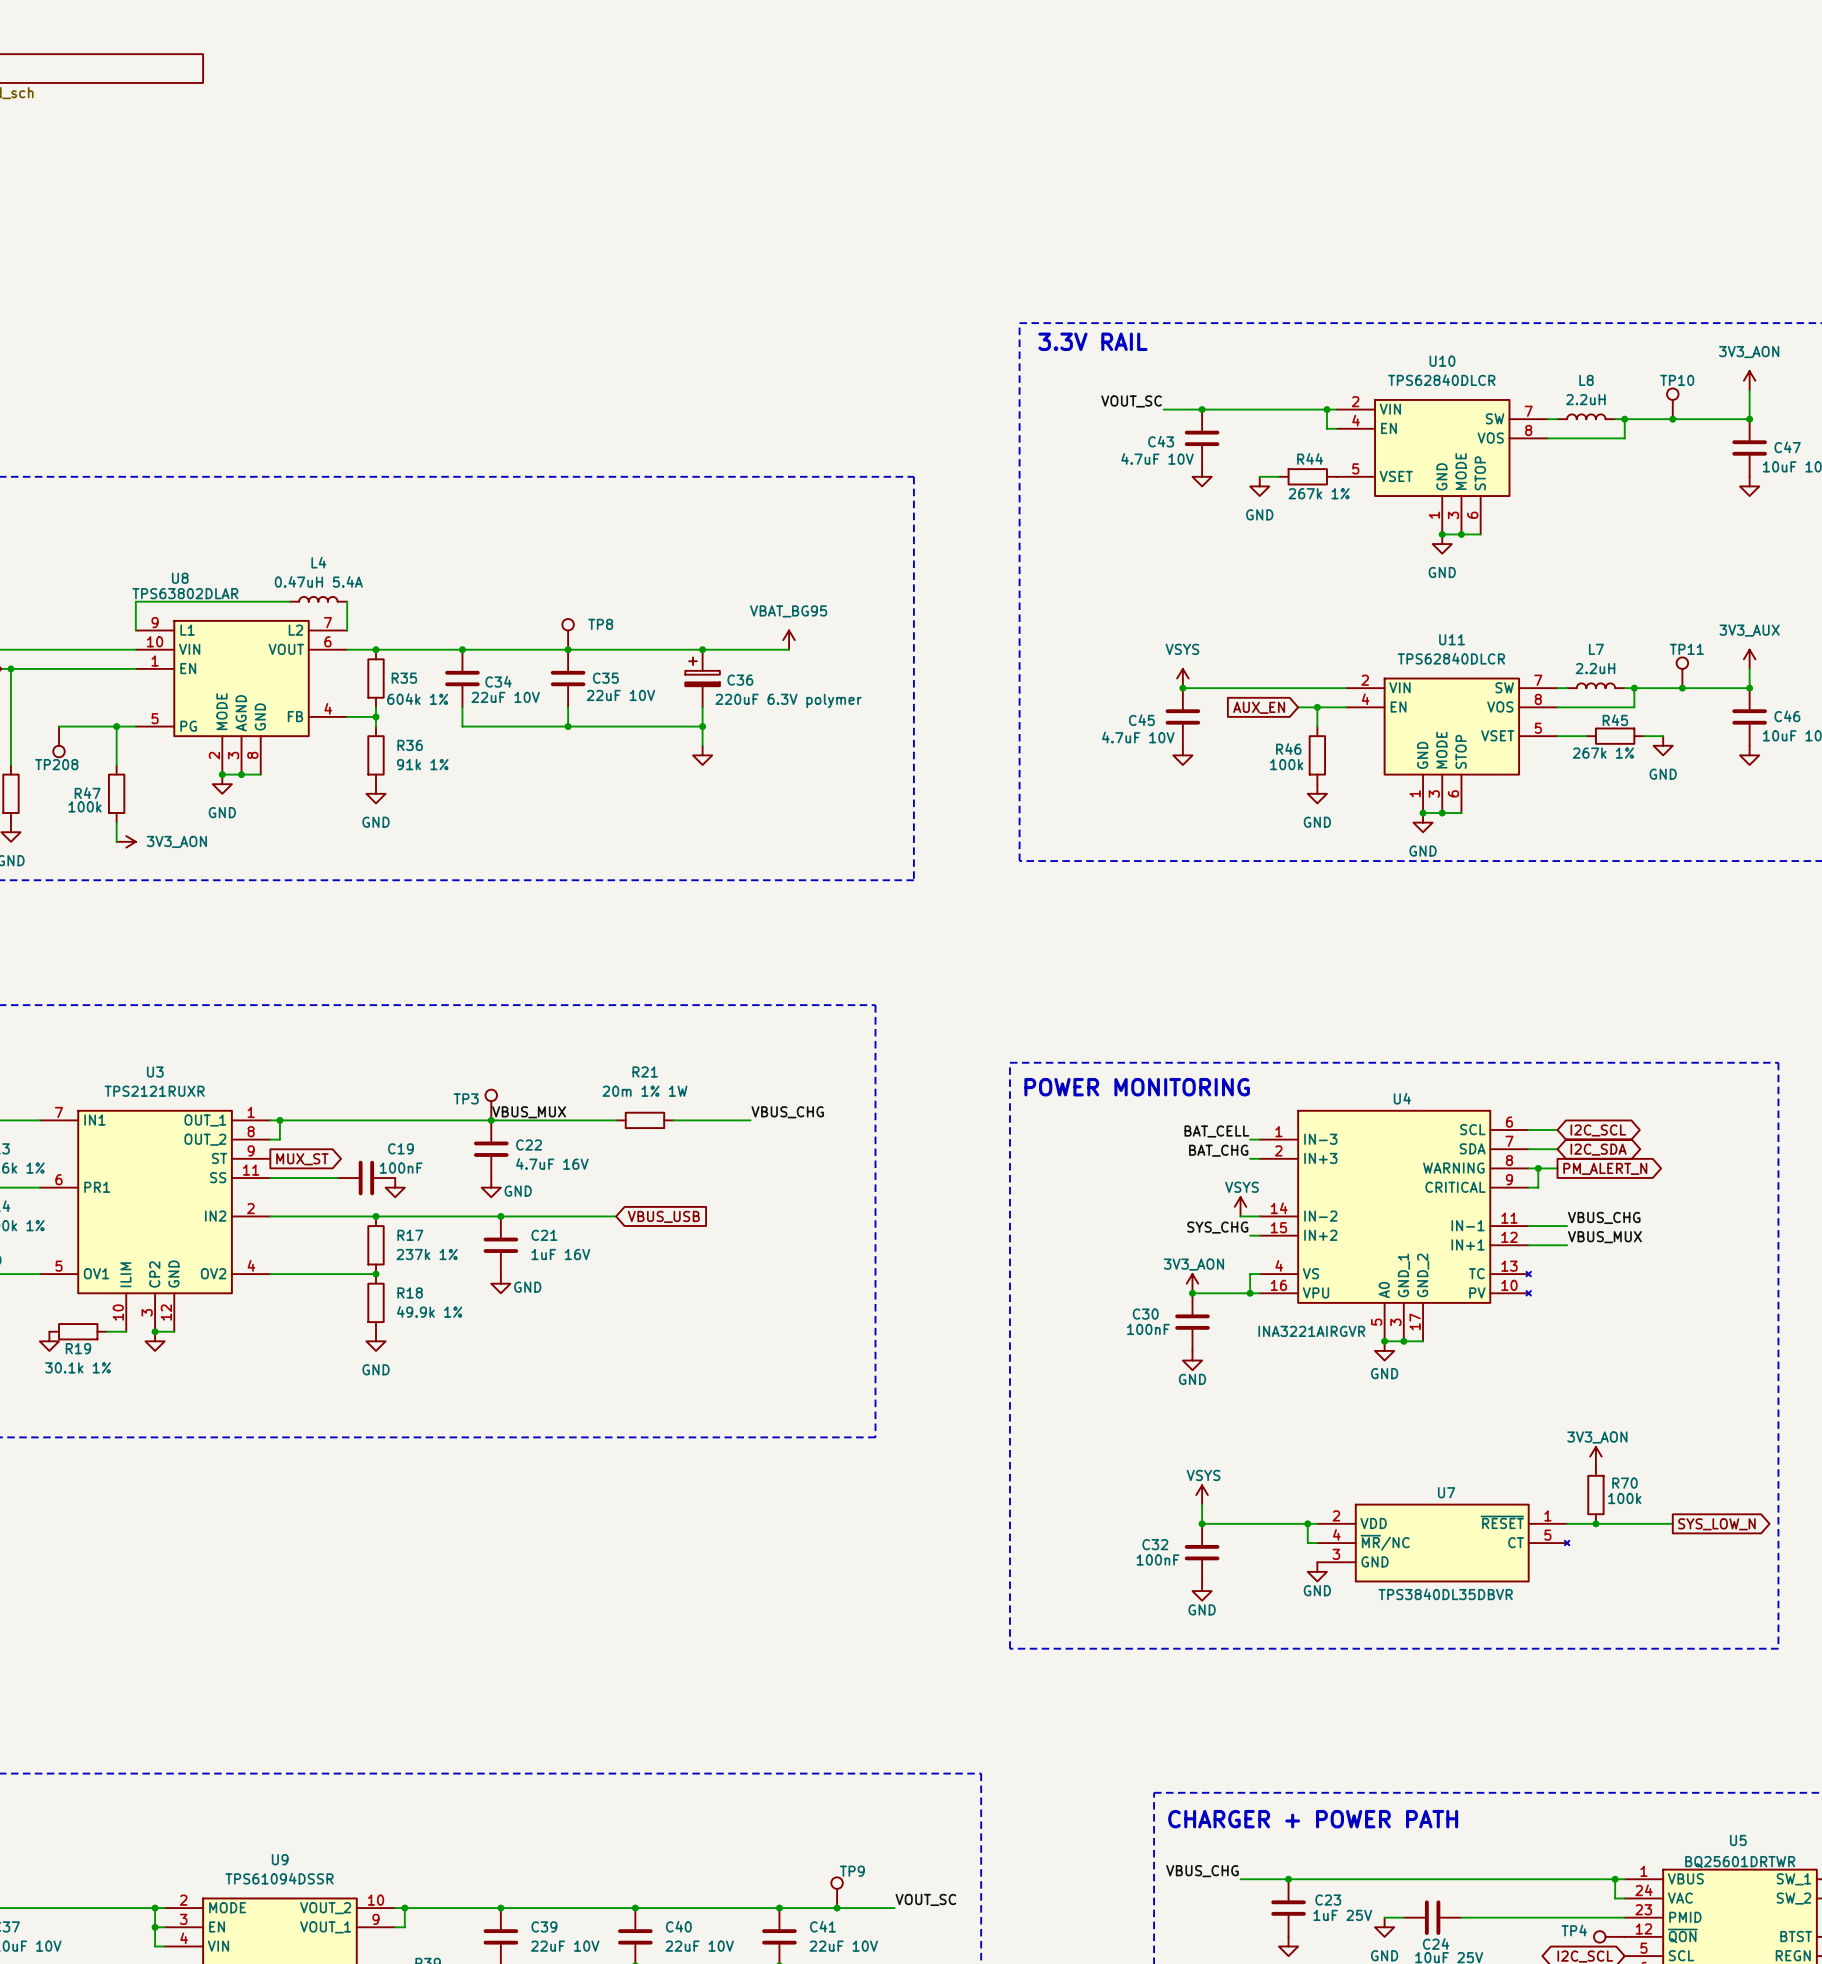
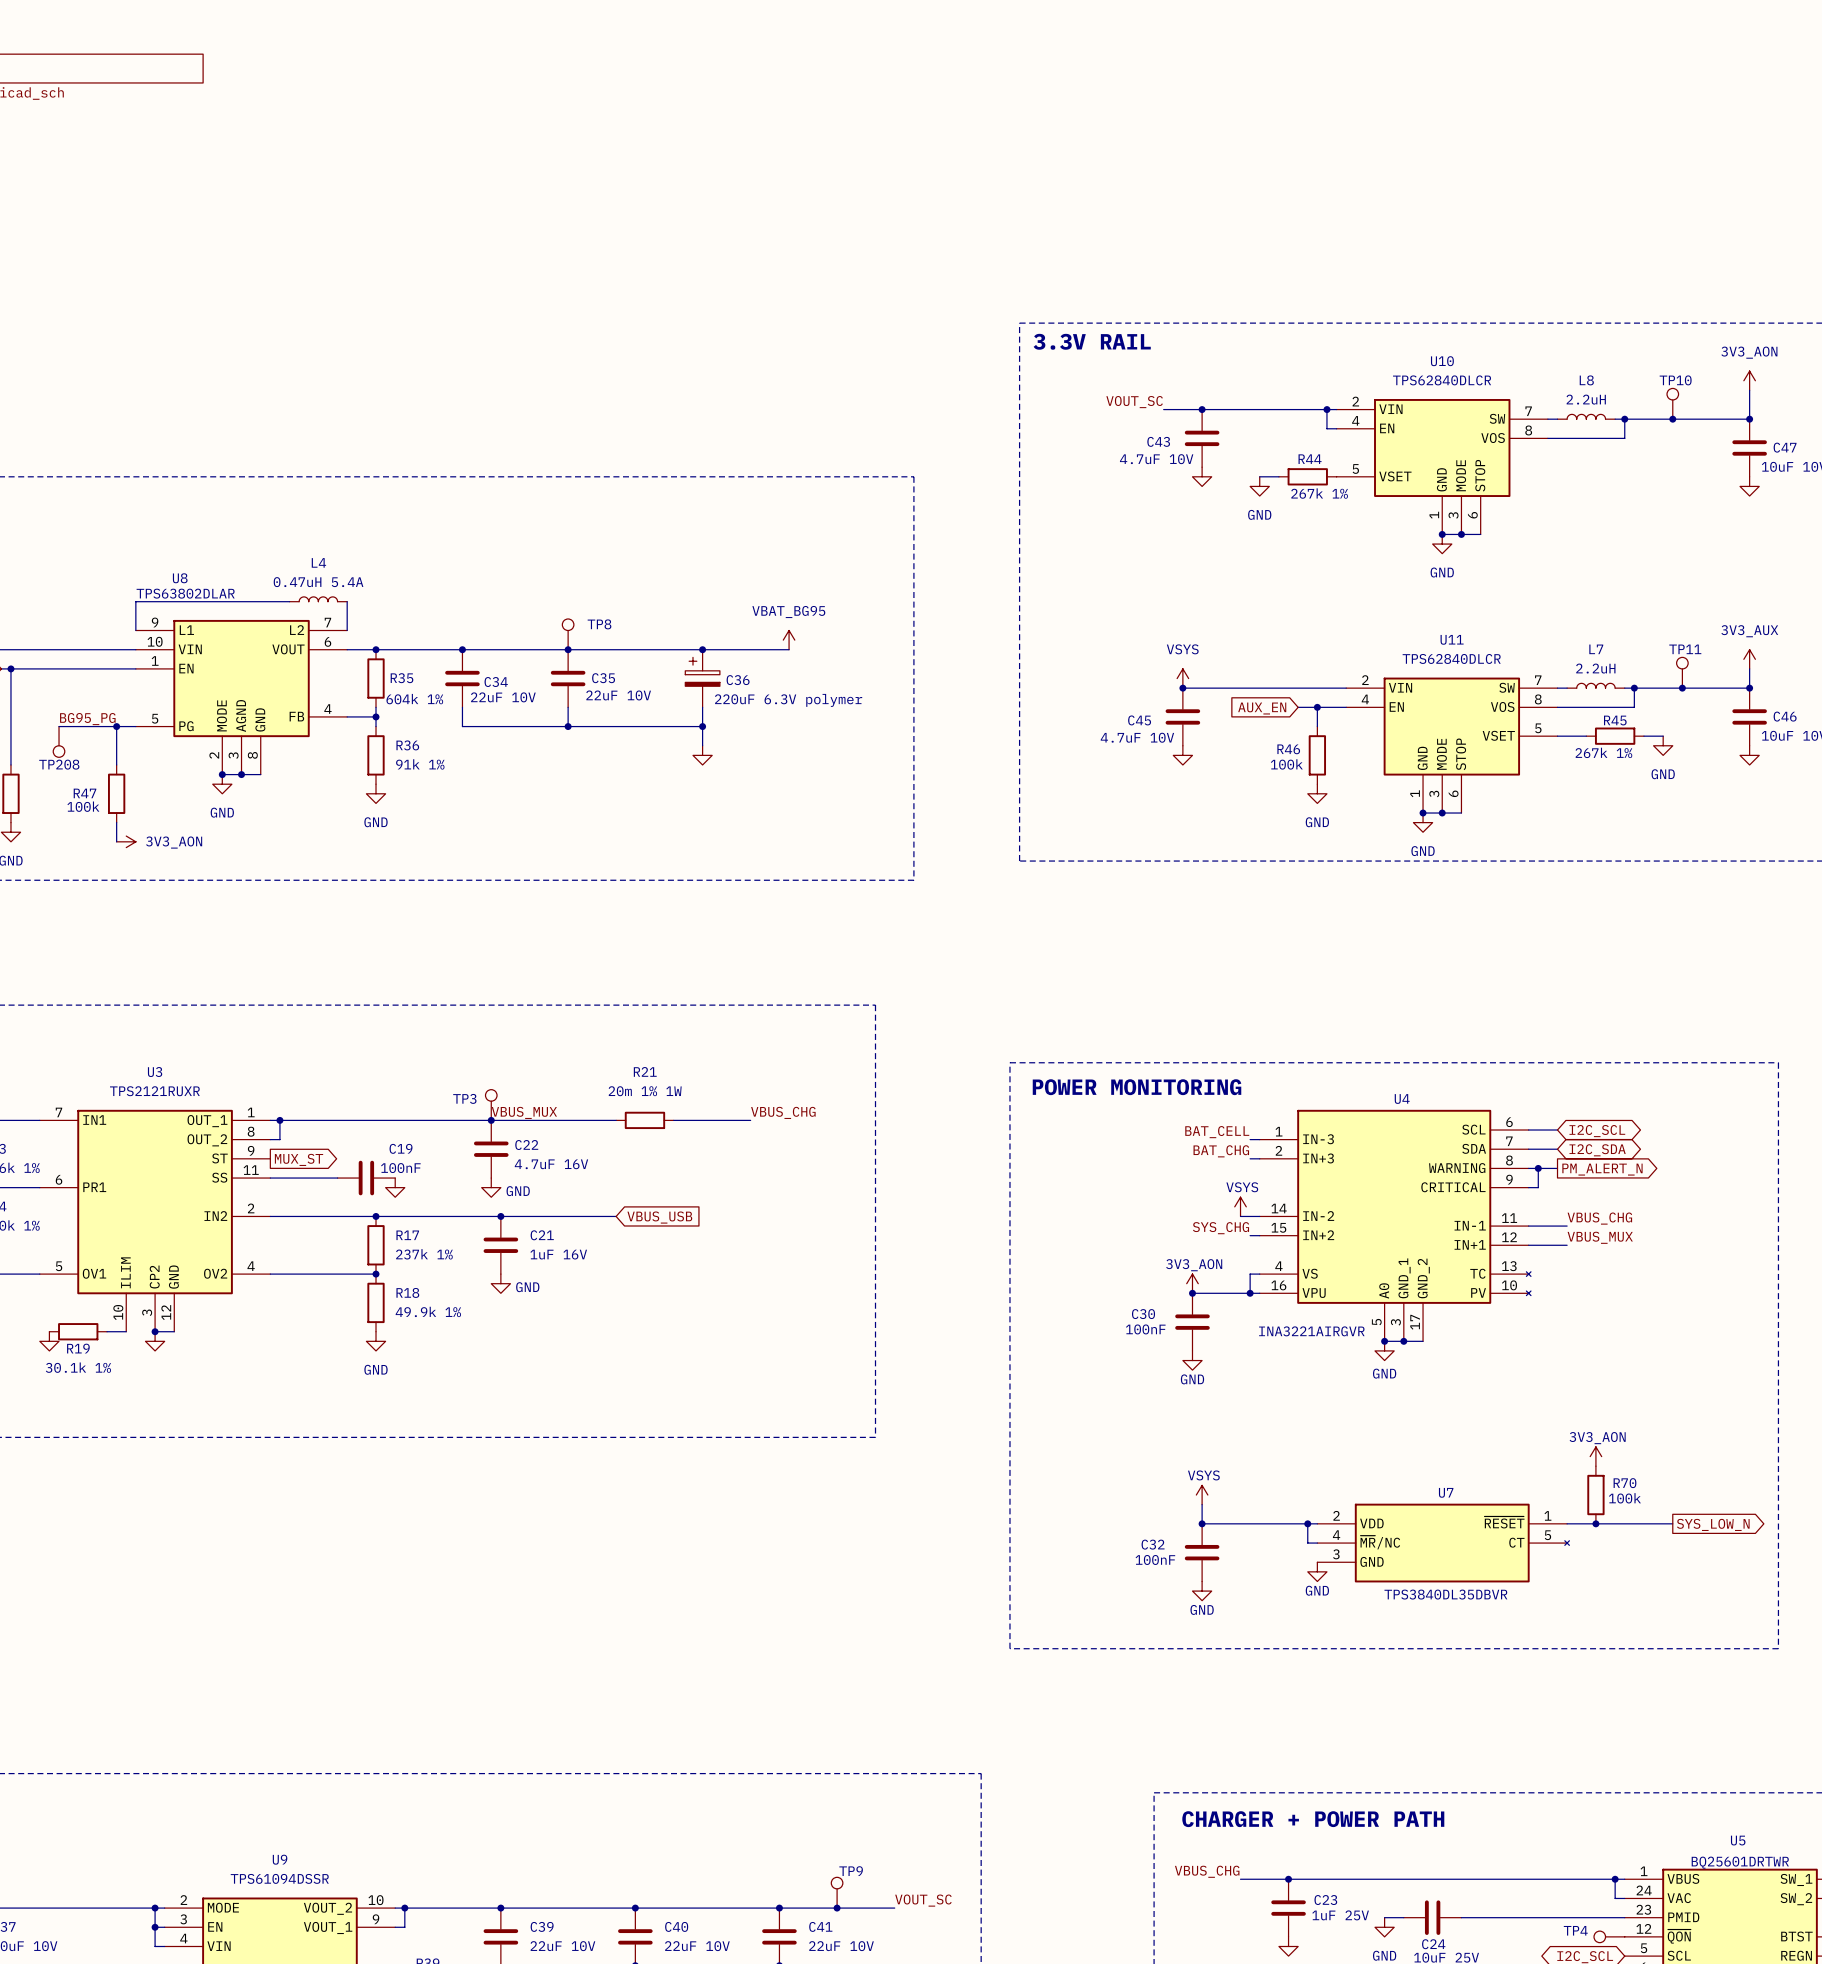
label: none -> BG95_PG (87, 719)

